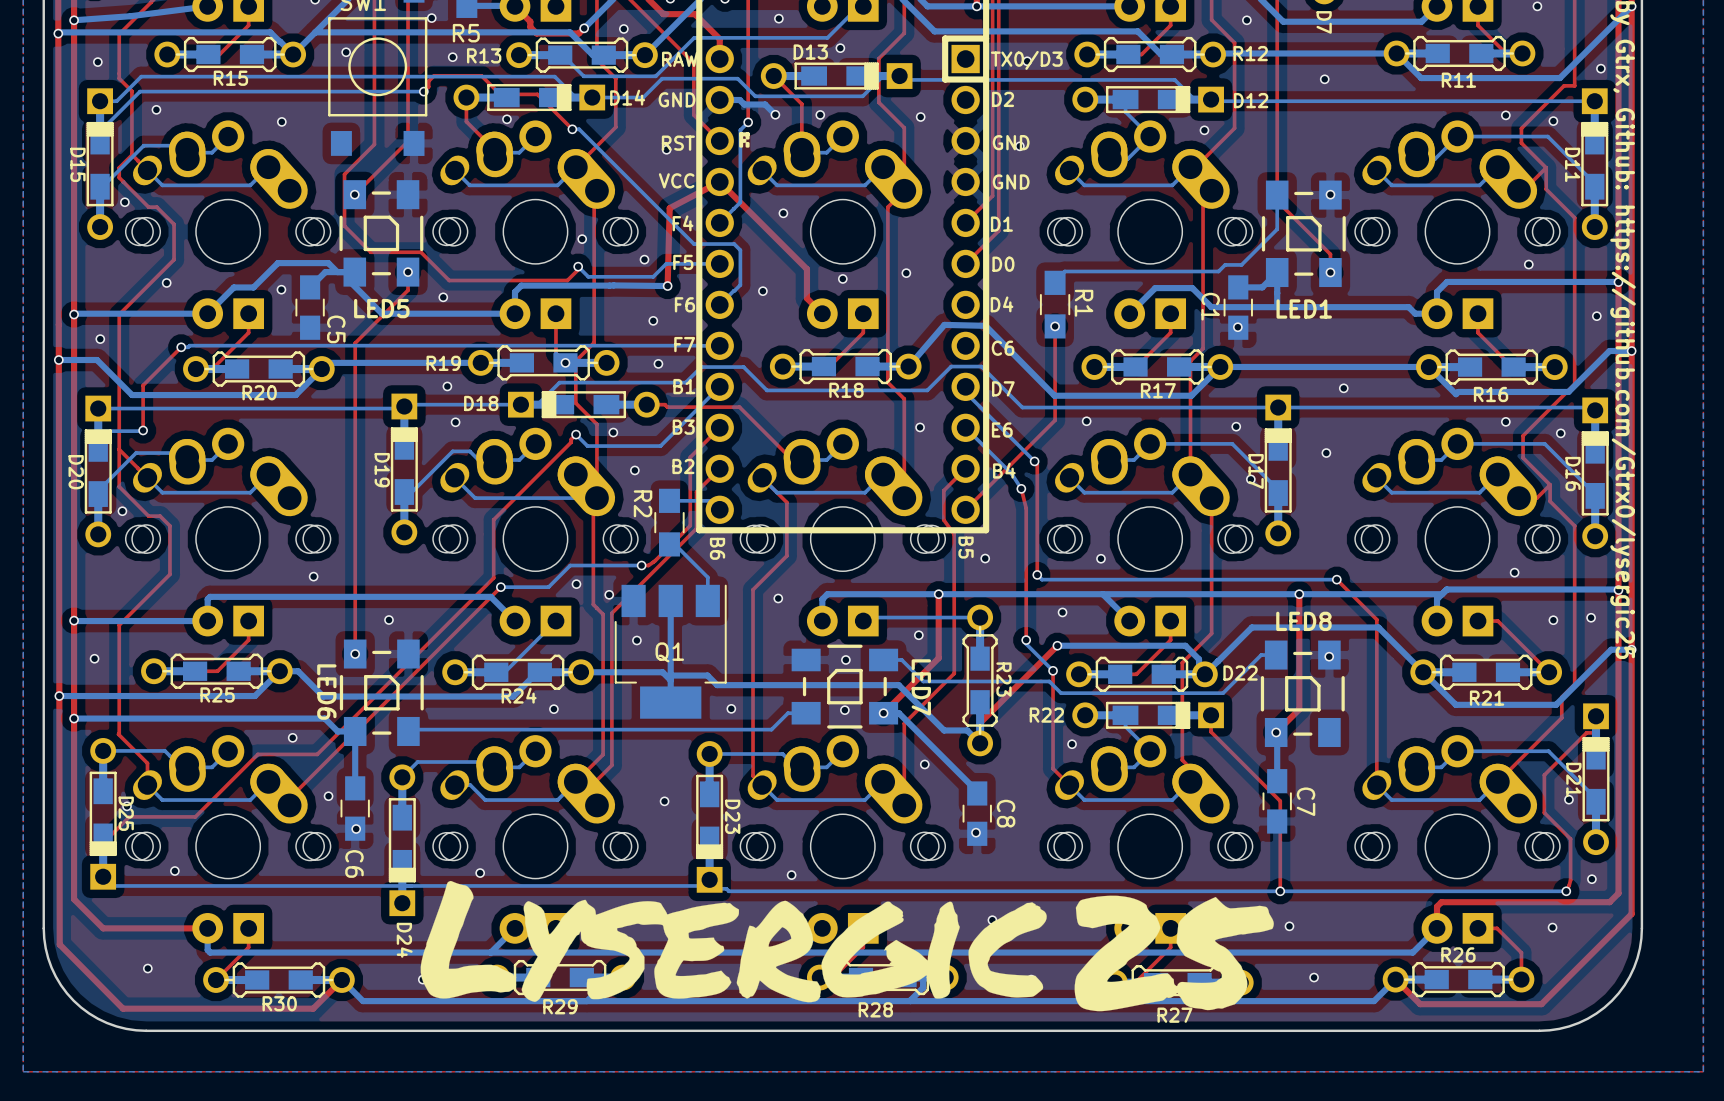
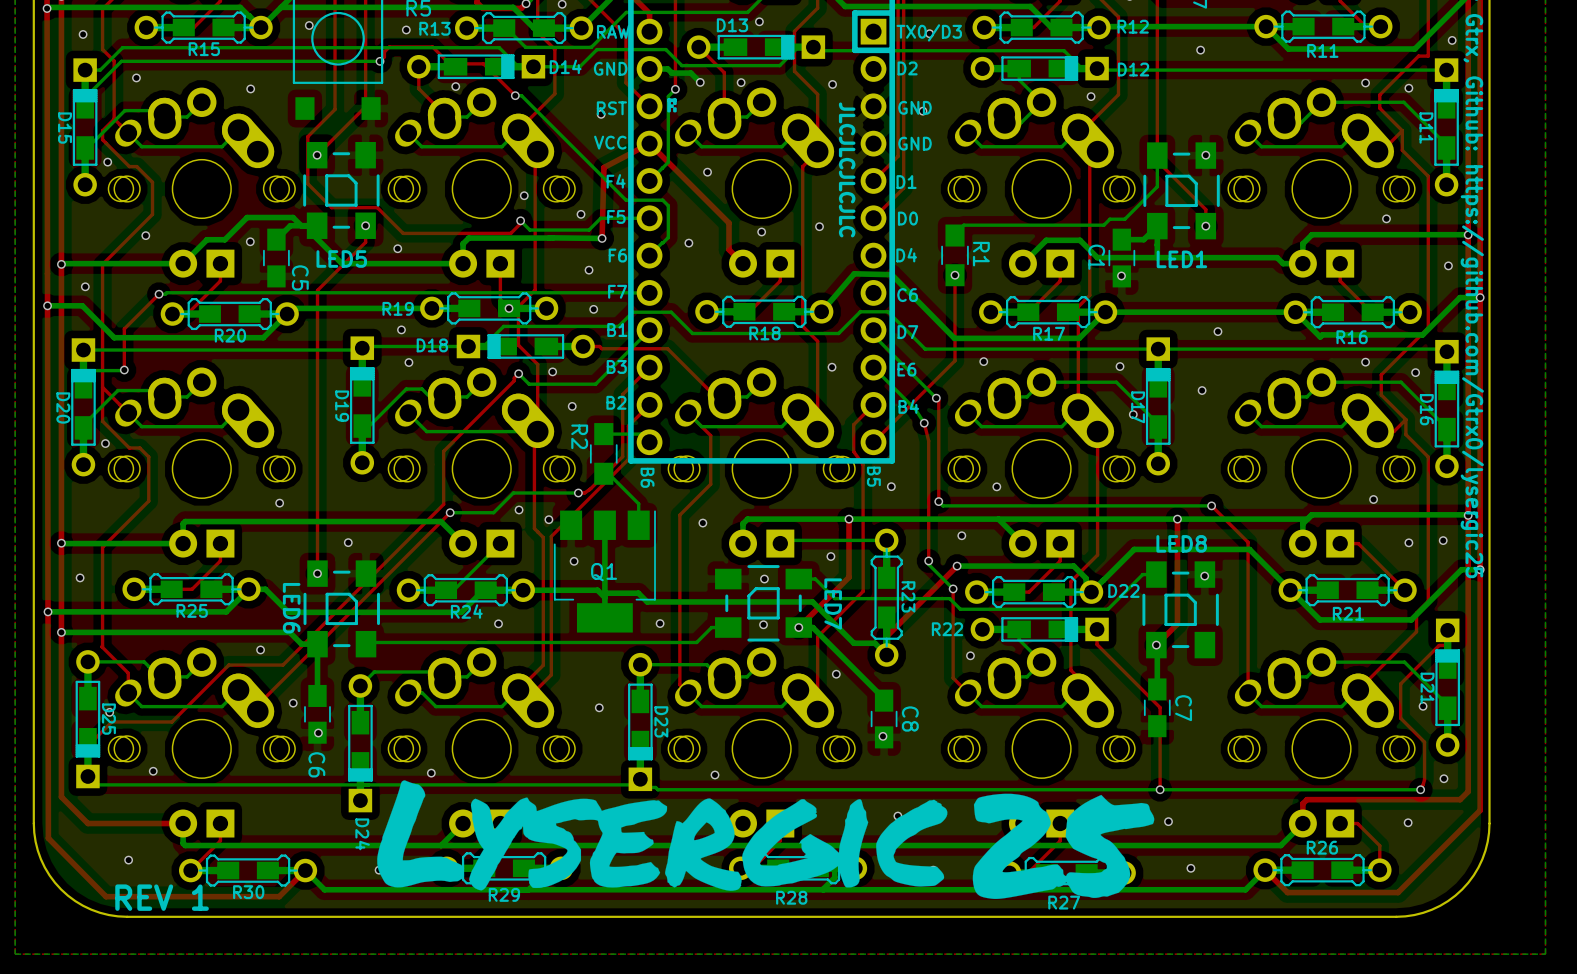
text: none -> JLCJLCJLCJLC (847, 169)
text: none -> REV 1 (162, 897)

